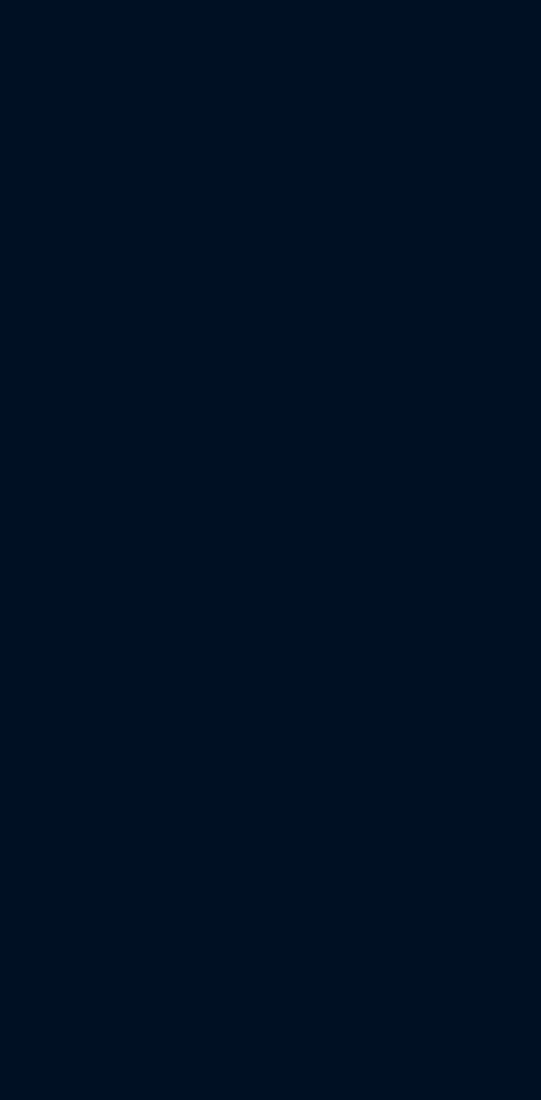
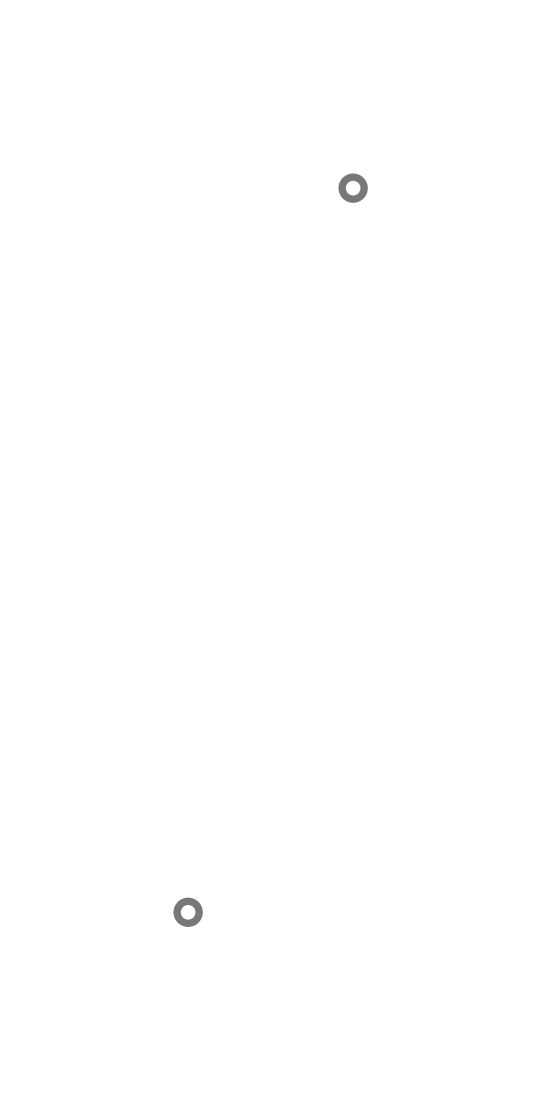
via: none -> (353, 188)
via: none -> (188, 912)

